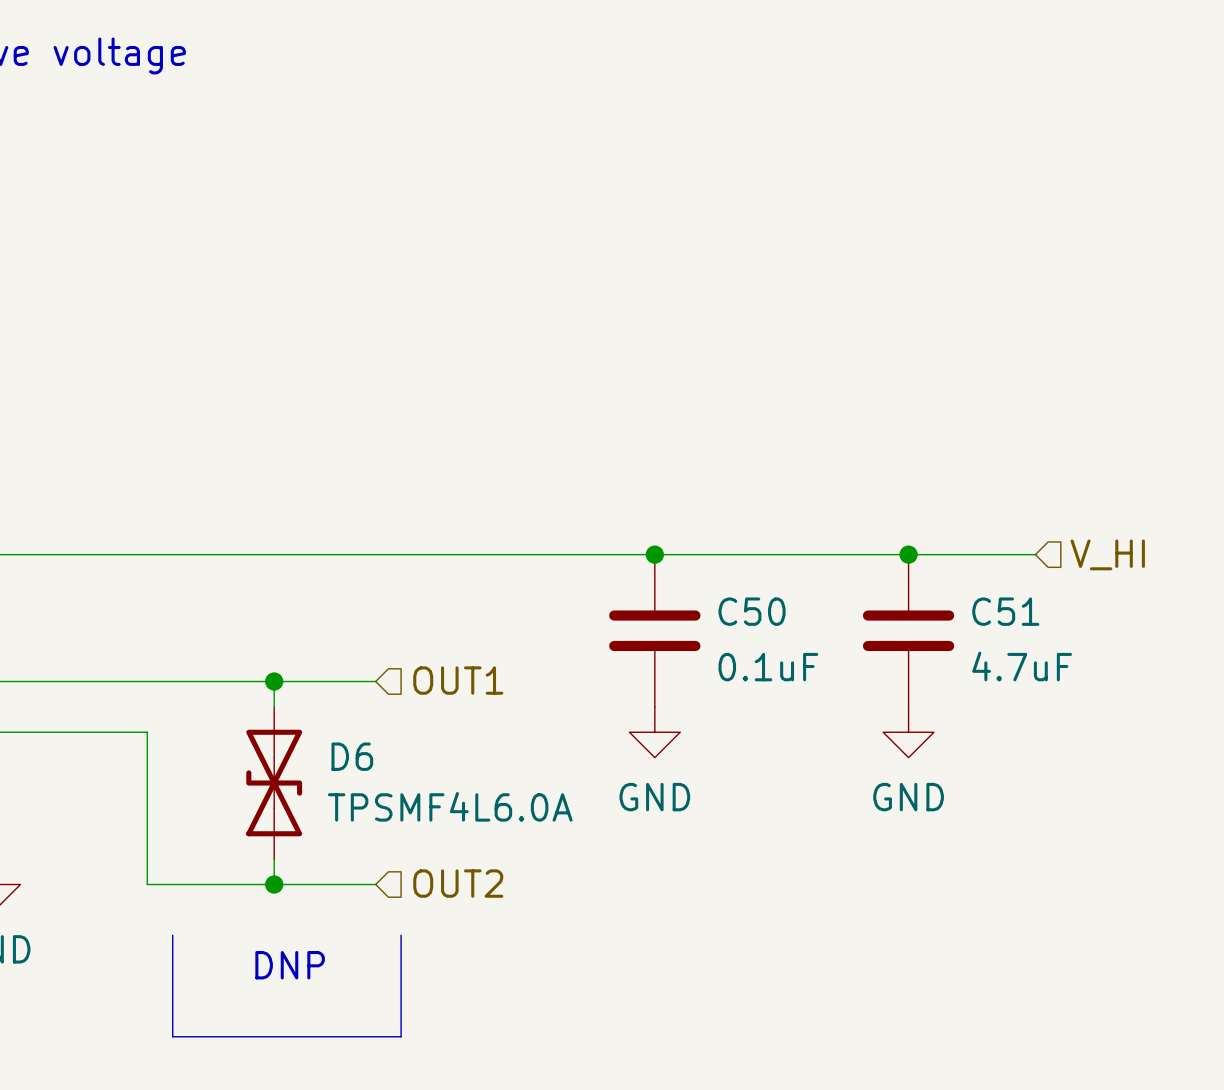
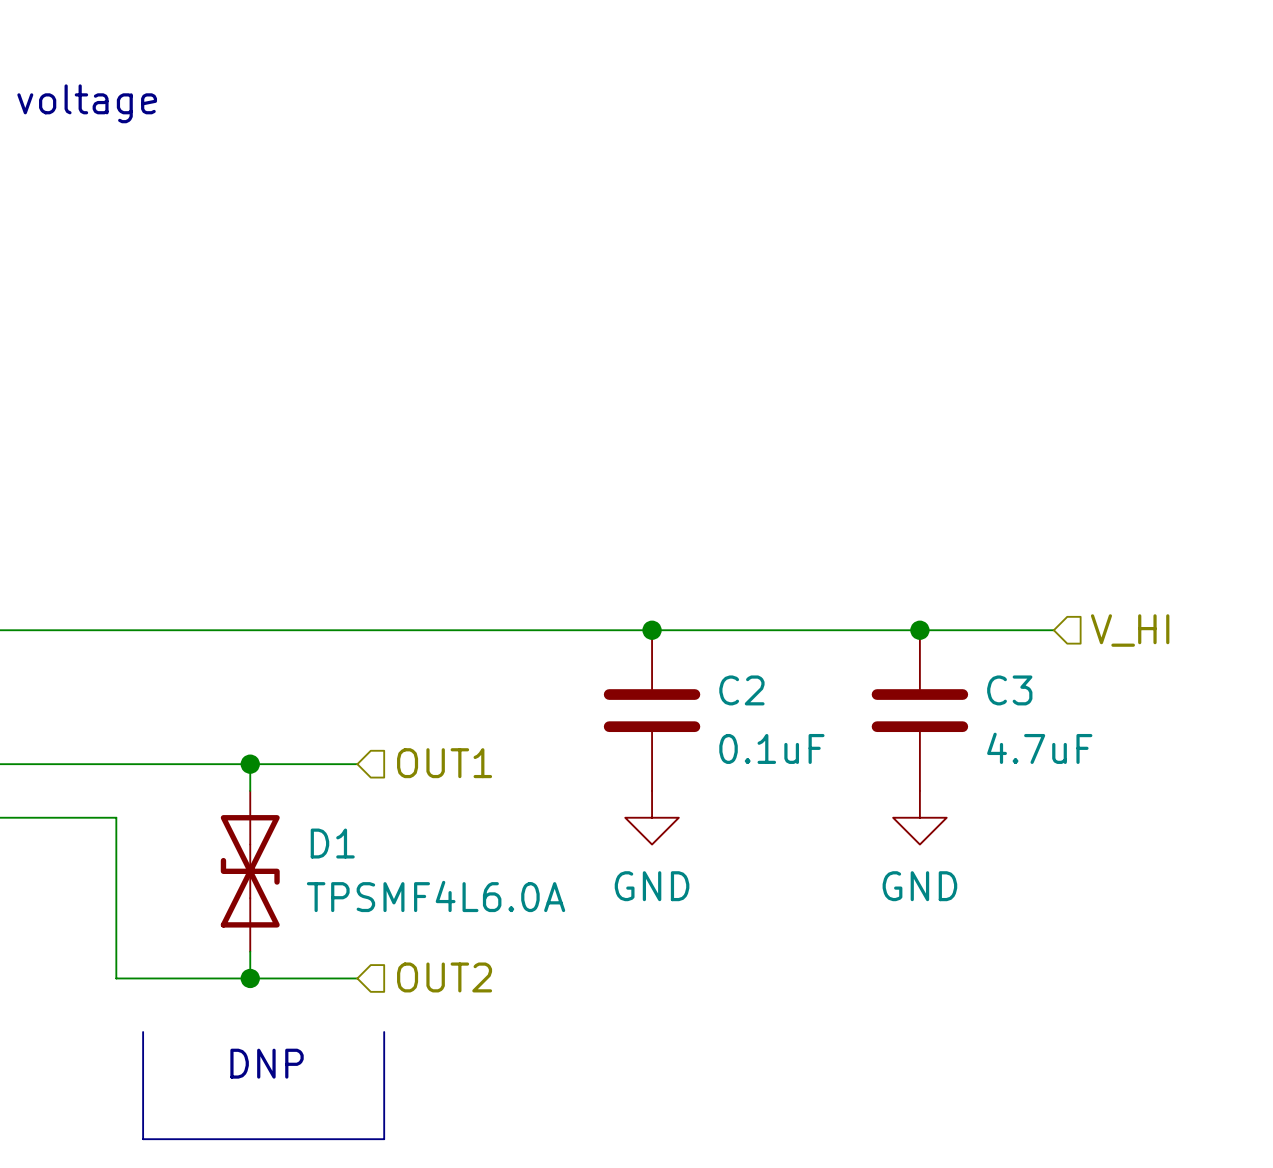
C50 name: C50 (752, 611) -> C2 (741, 690)
C51 name: C51 (1005, 611) -> C3 (1009, 690)
D6 name: D6 (352, 756) -> D1 (332, 843)

